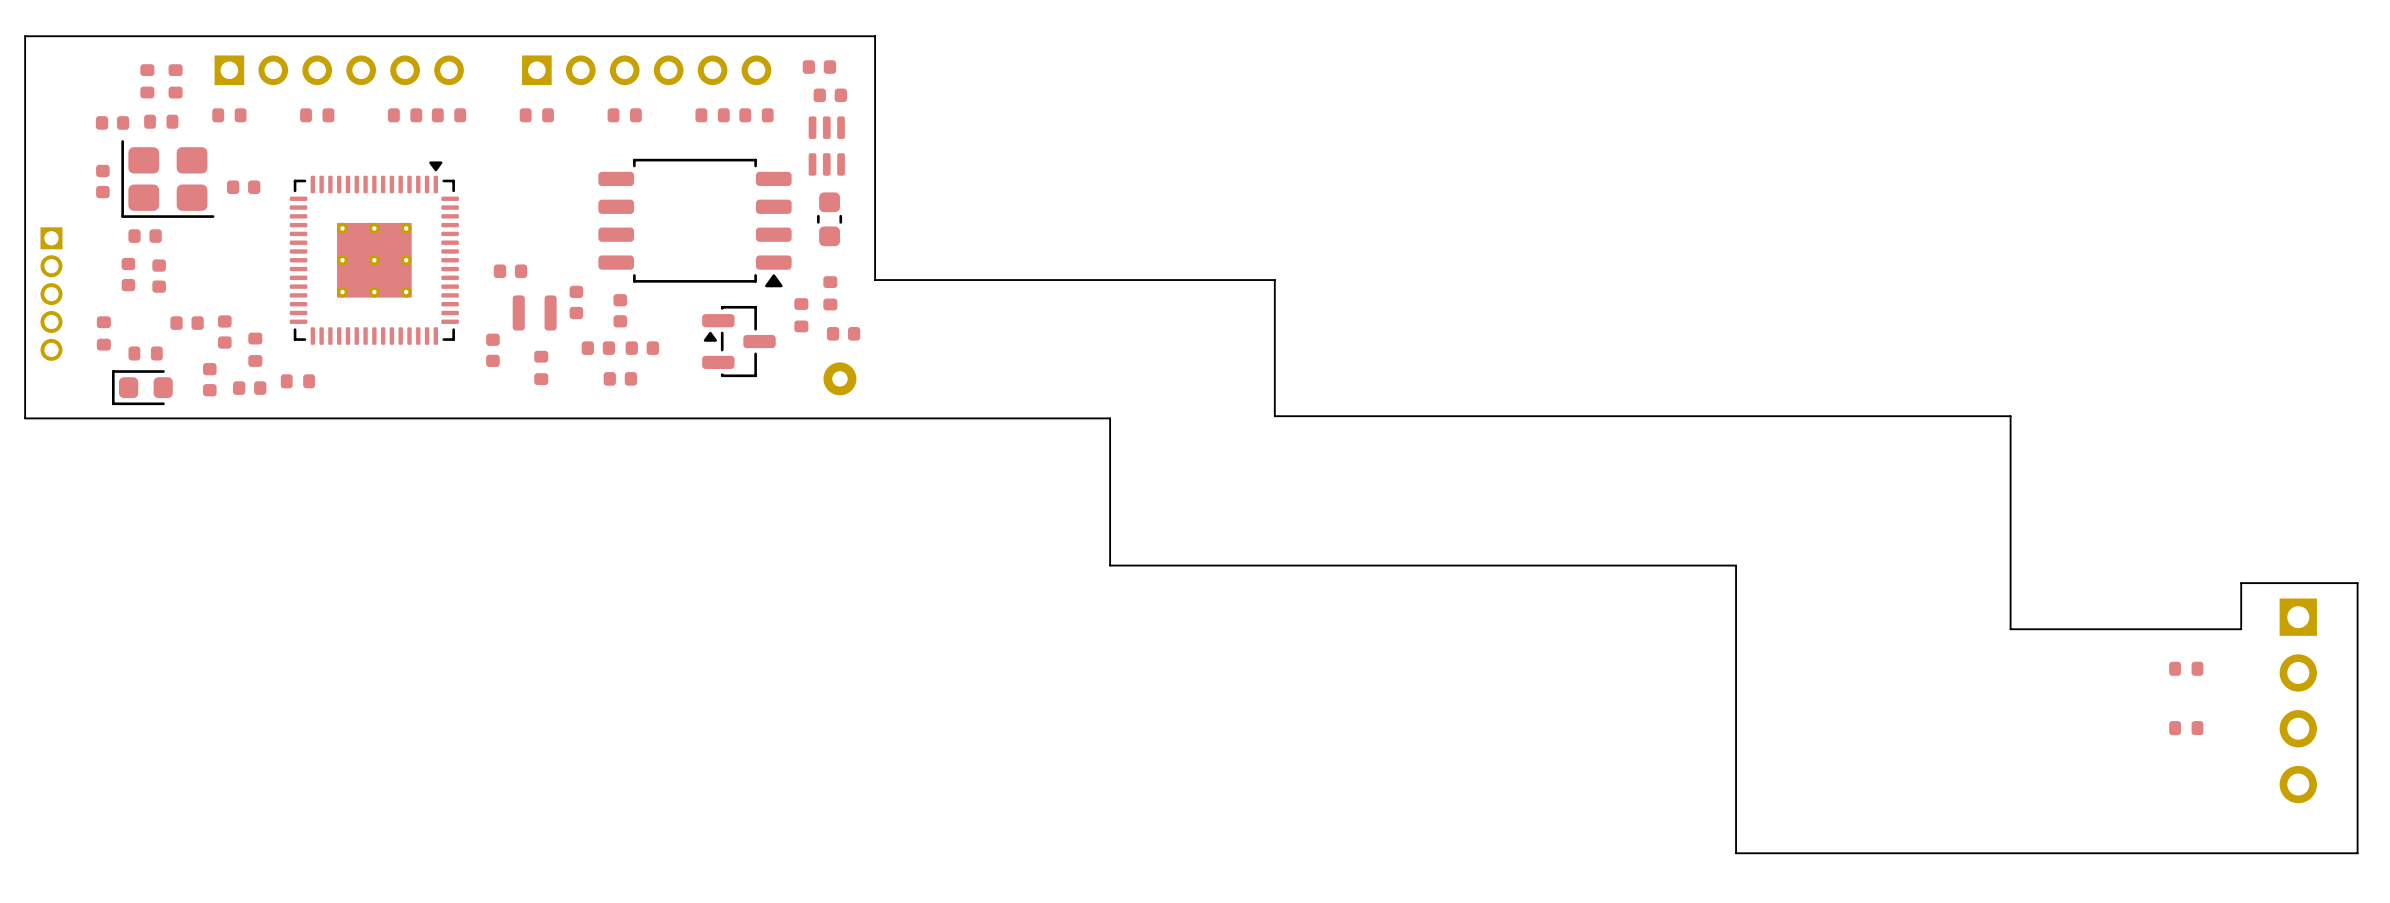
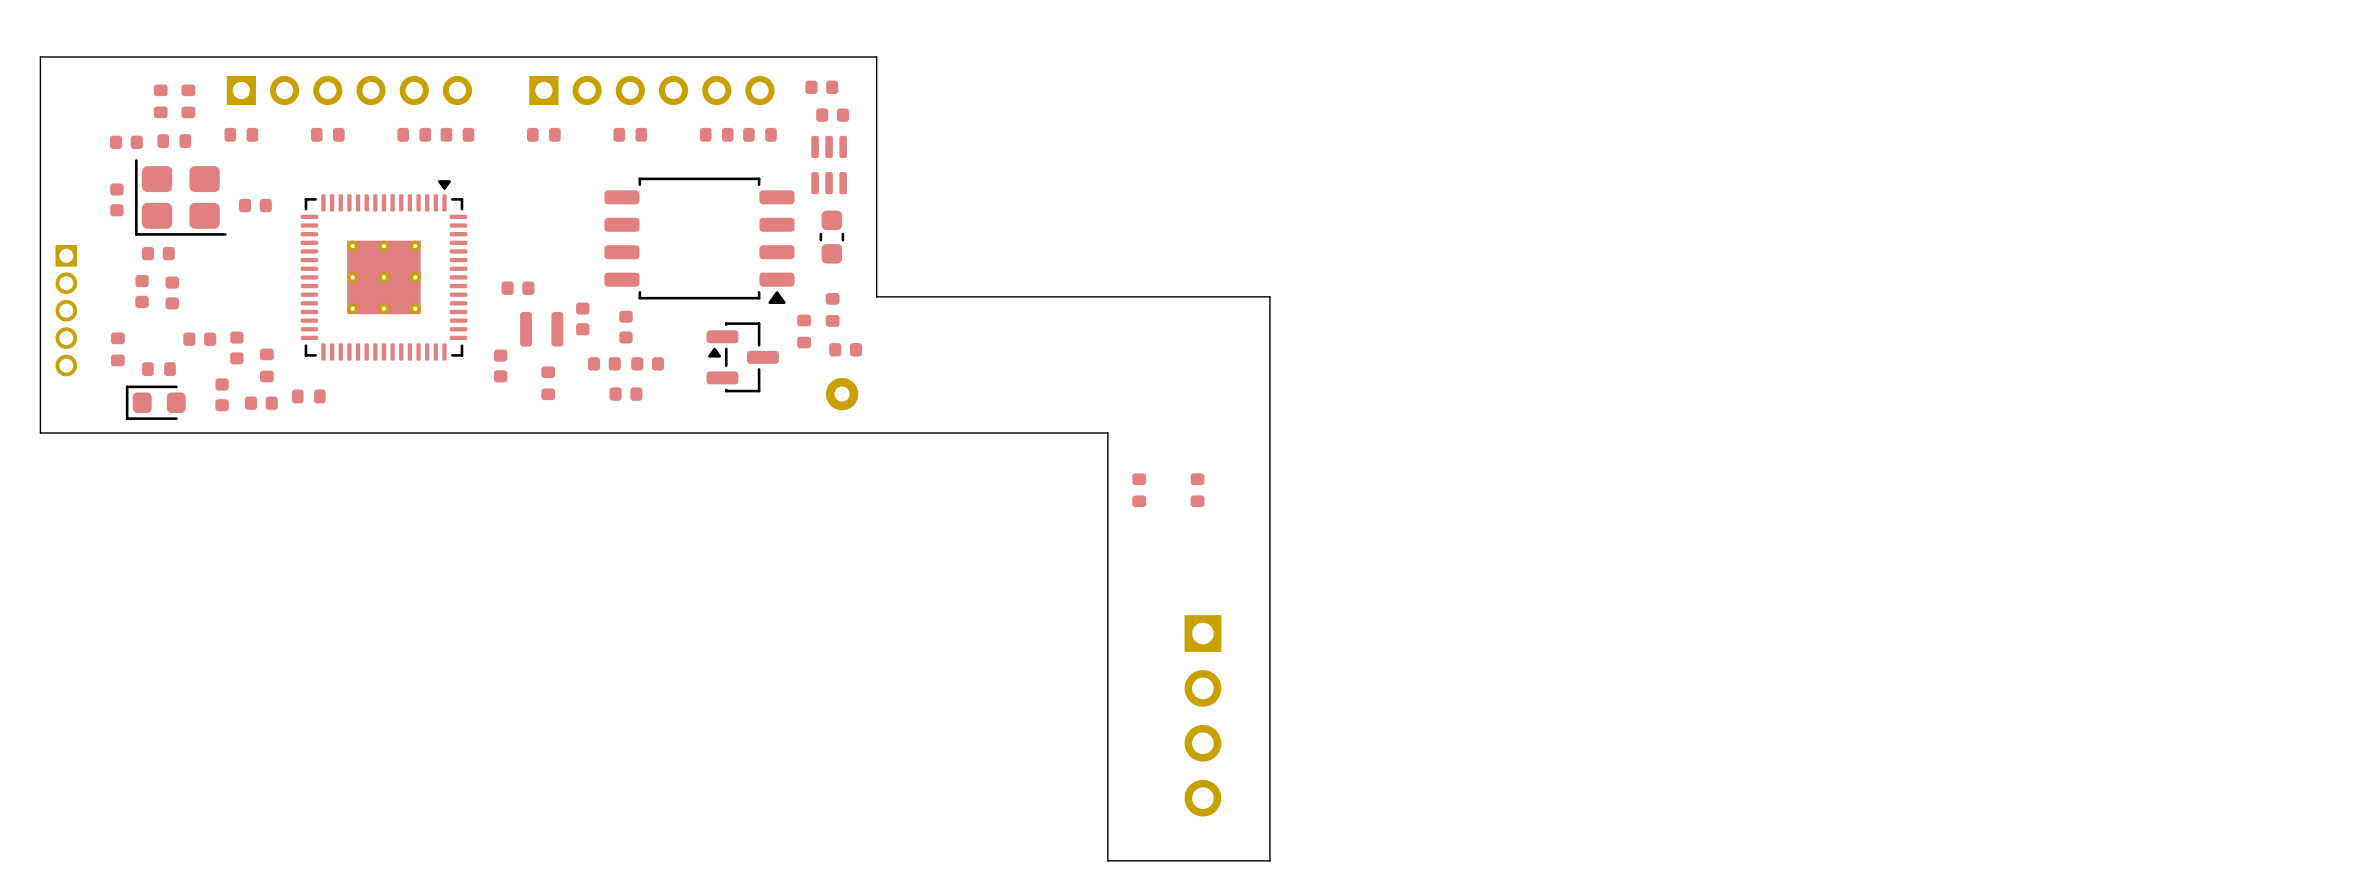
board edge: (1274, 416) (2010, 416) (2010, 629) (2241, 629) (2241, 583) (2357, 583) (2357, 853) (1736, 853) (1736, 565) (1110, 565) -> (1269, 430) (1269, 860) (1107, 860) (1107, 577)
part: none -> (1139, 490)
part: none -> (1197, 490)
part: (2186, 668) -> none
part: (2298, 700) -> none
part: none -> (1202, 715)
part: (2186, 728) -> none

